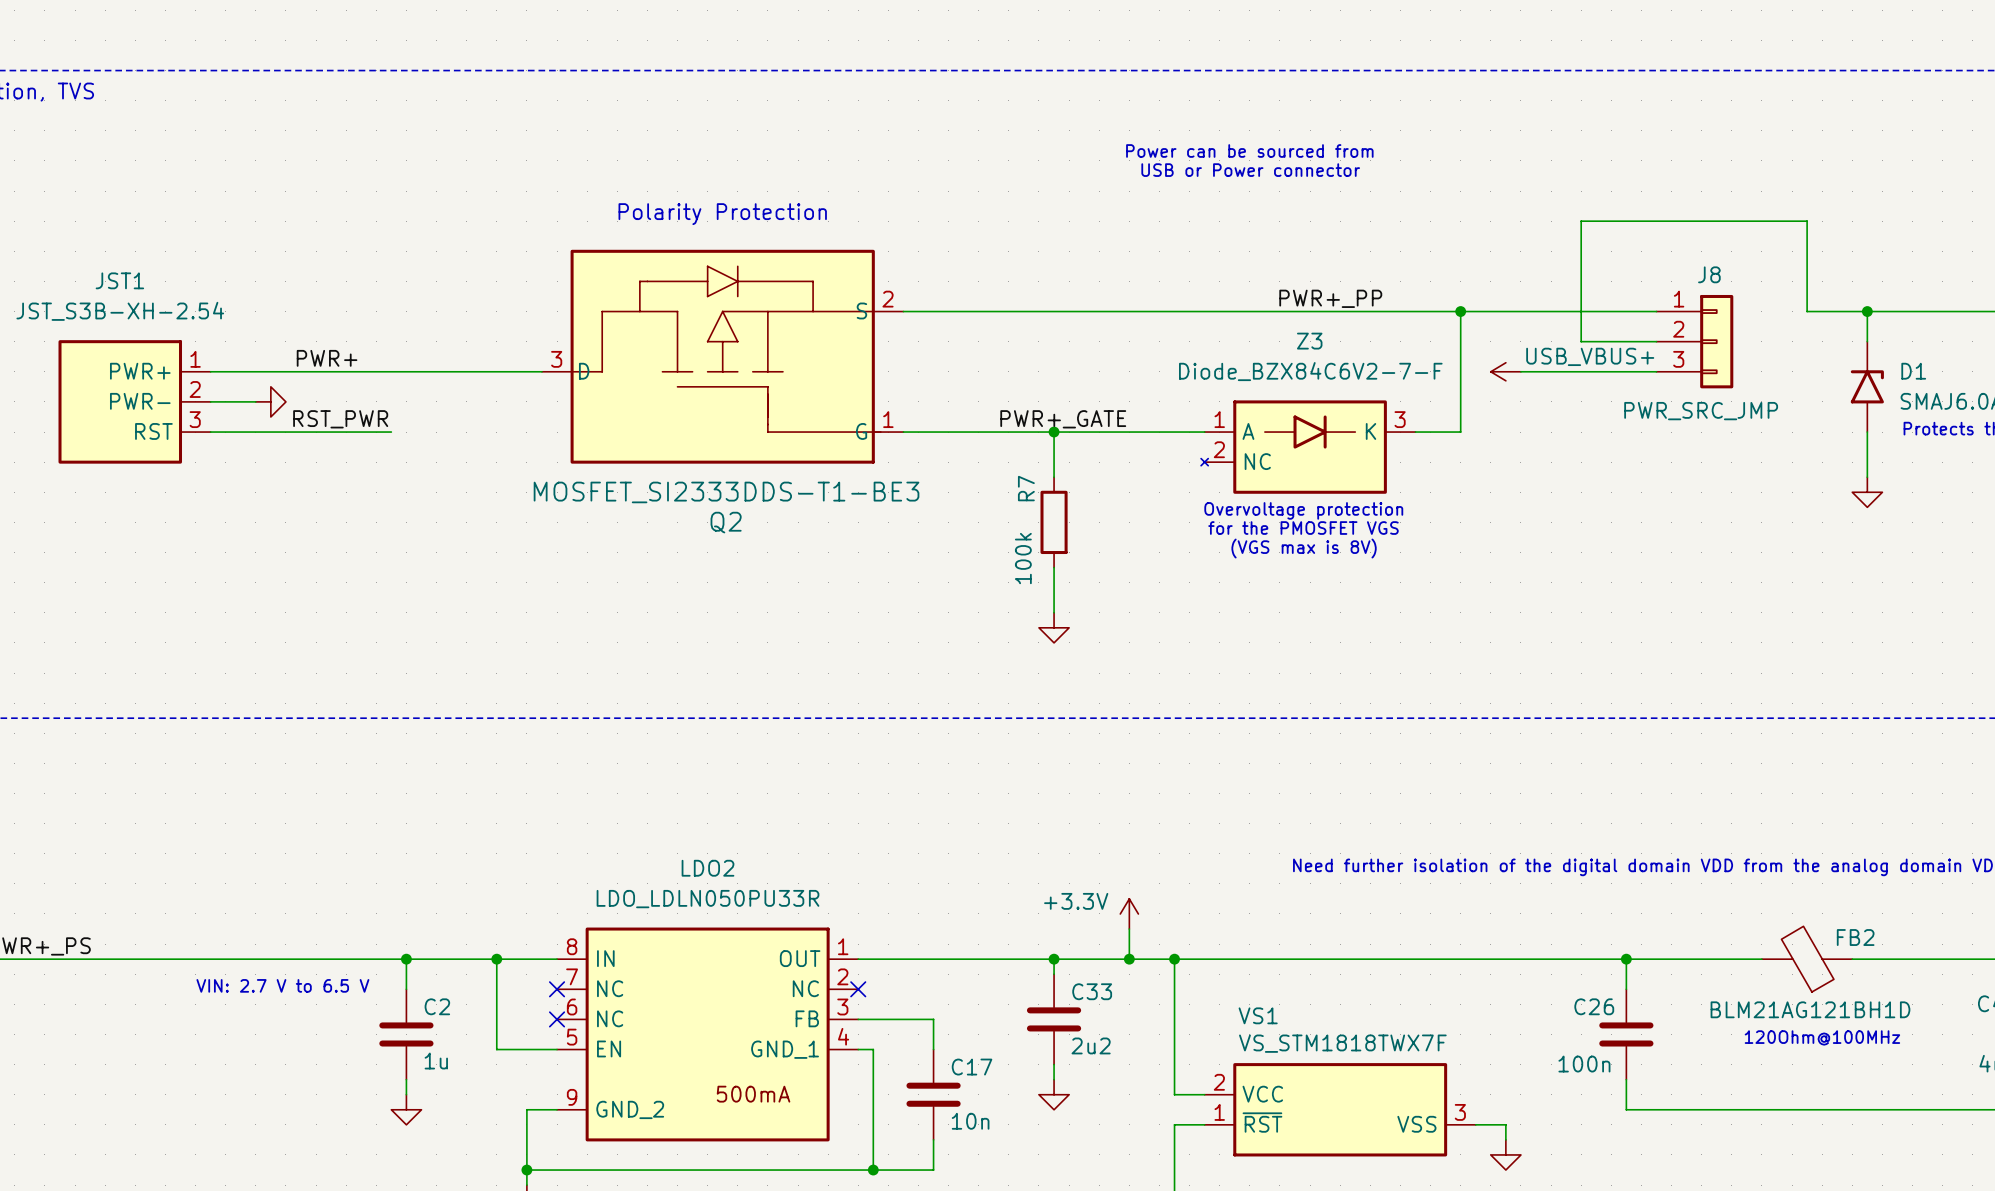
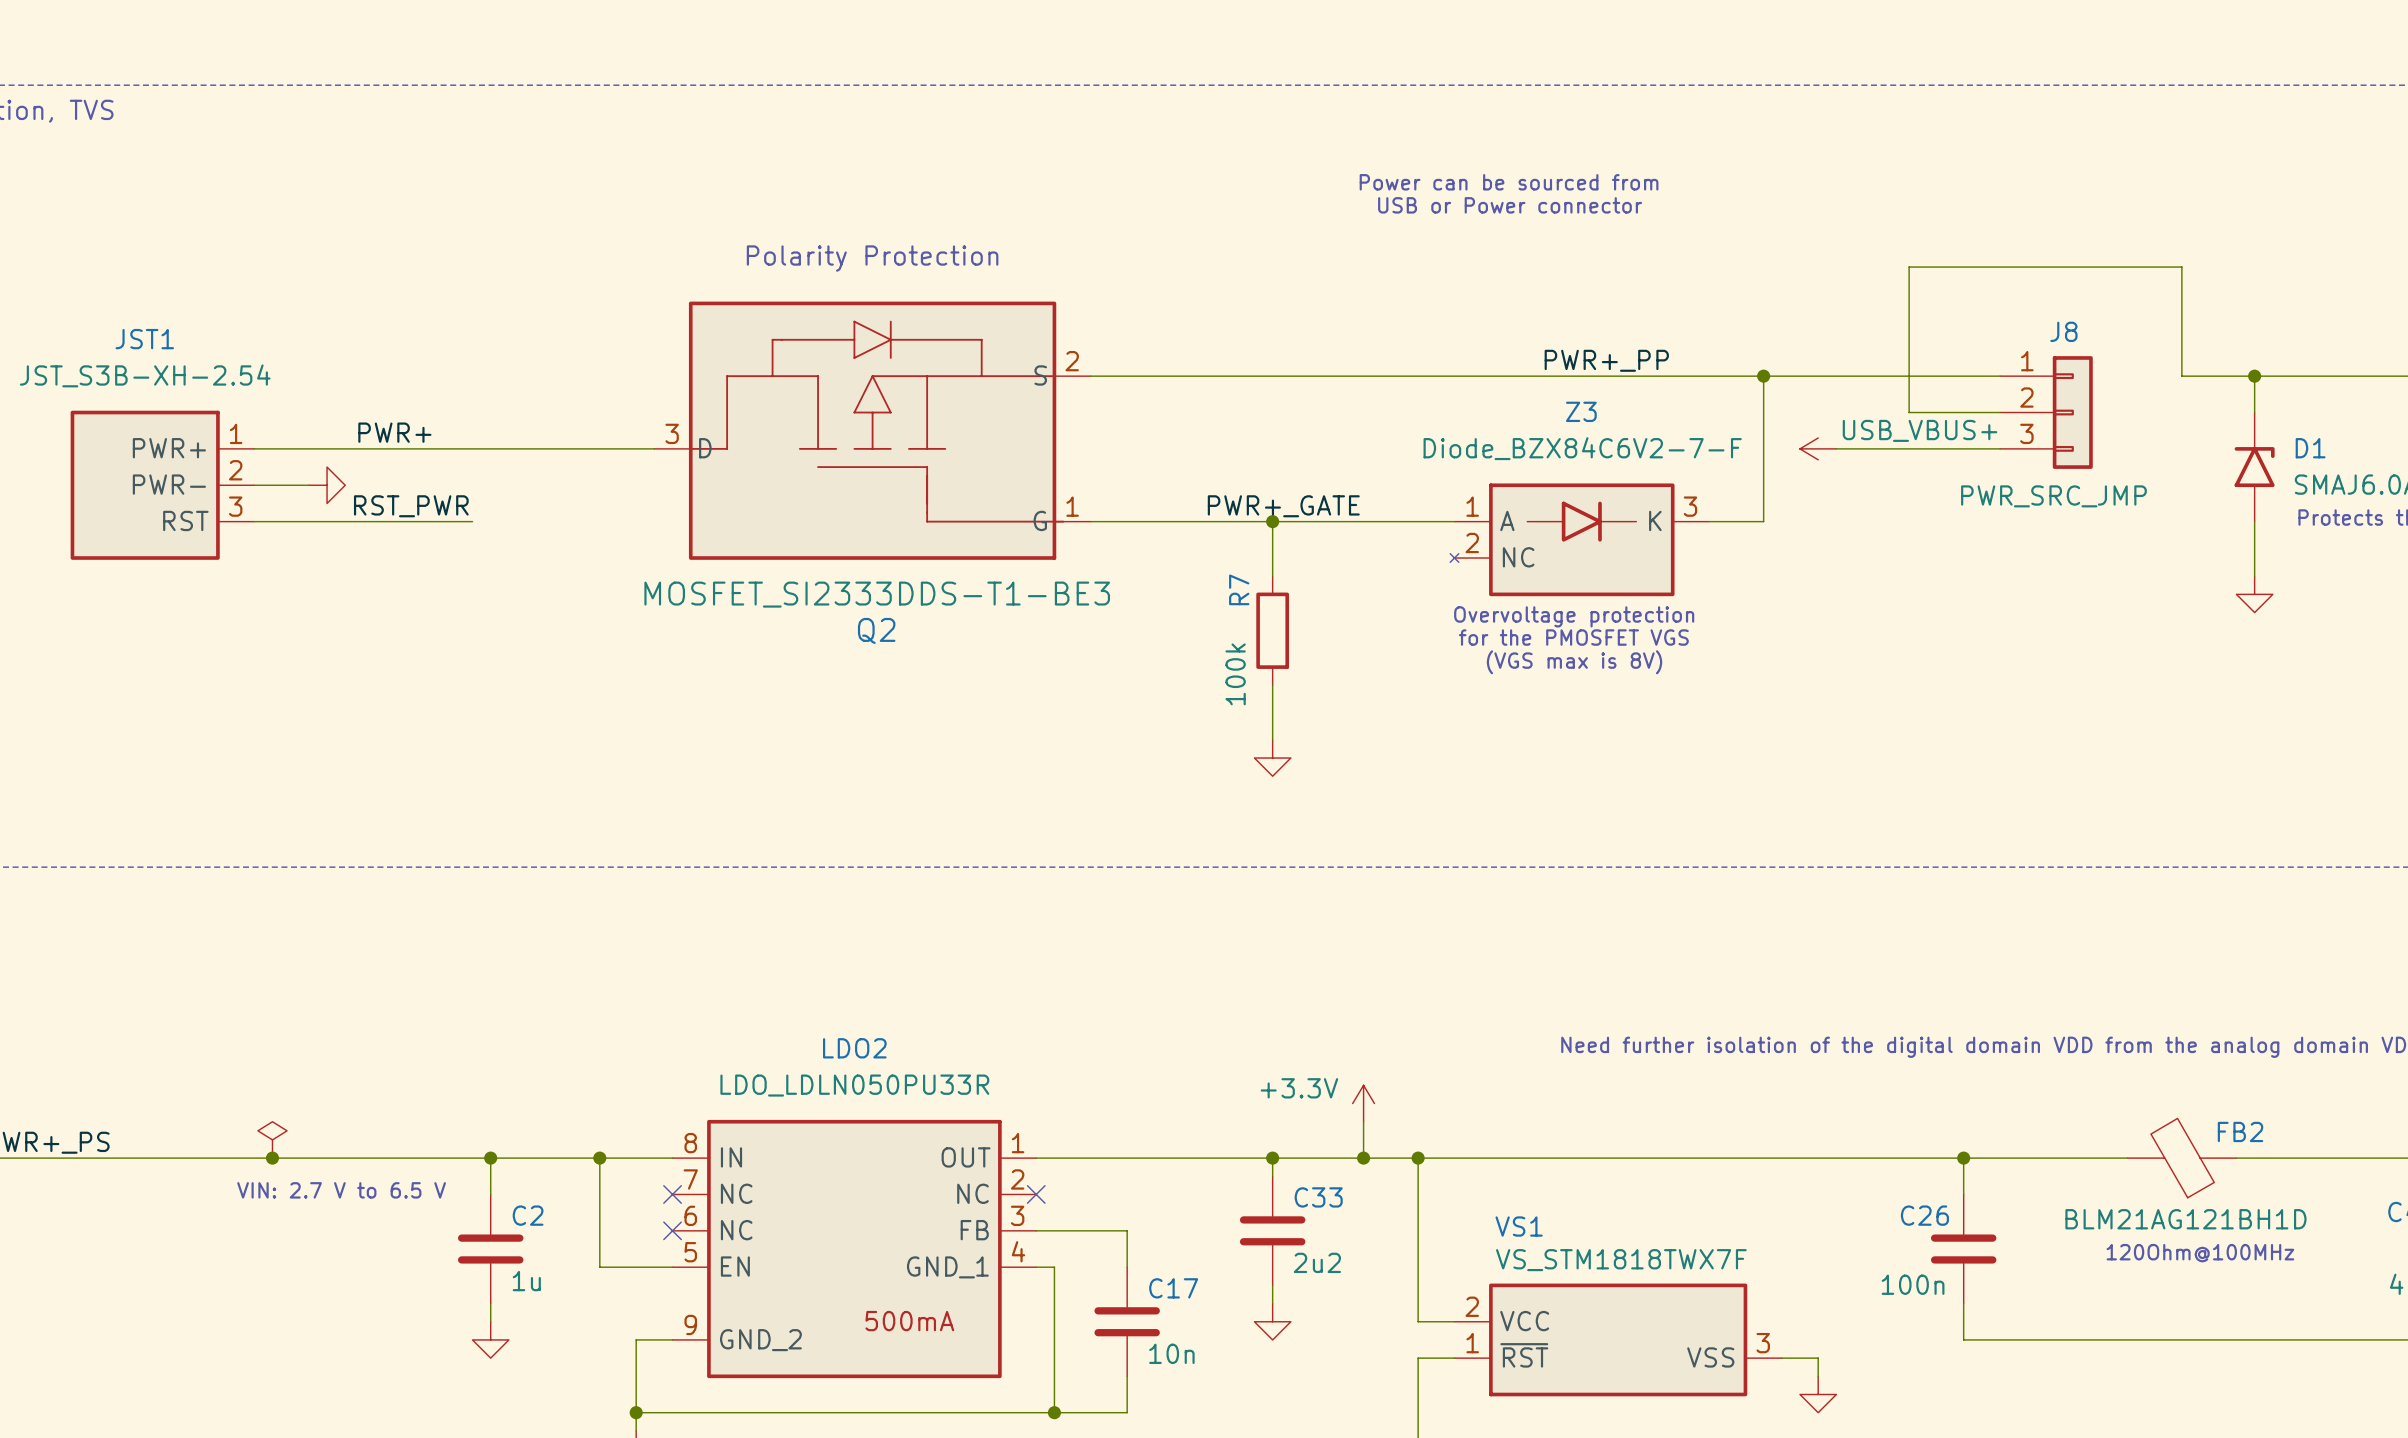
power symbol: none -> (272, 1139)
junction: none -> (272, 1158)

